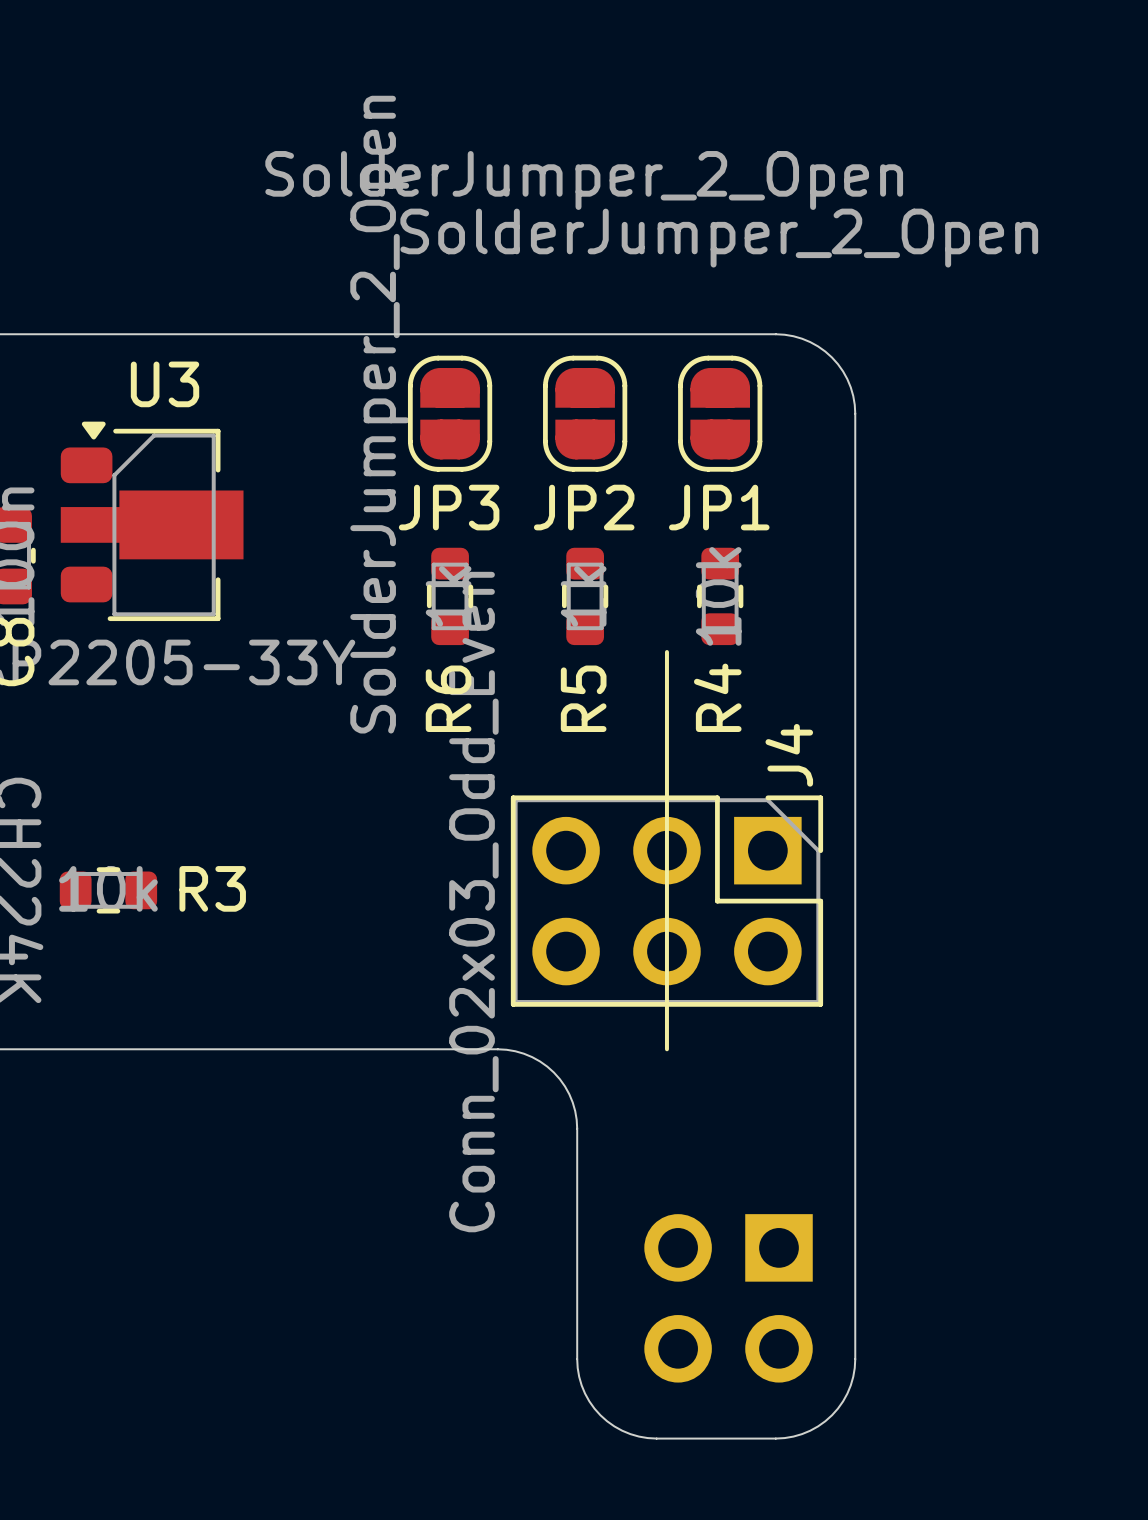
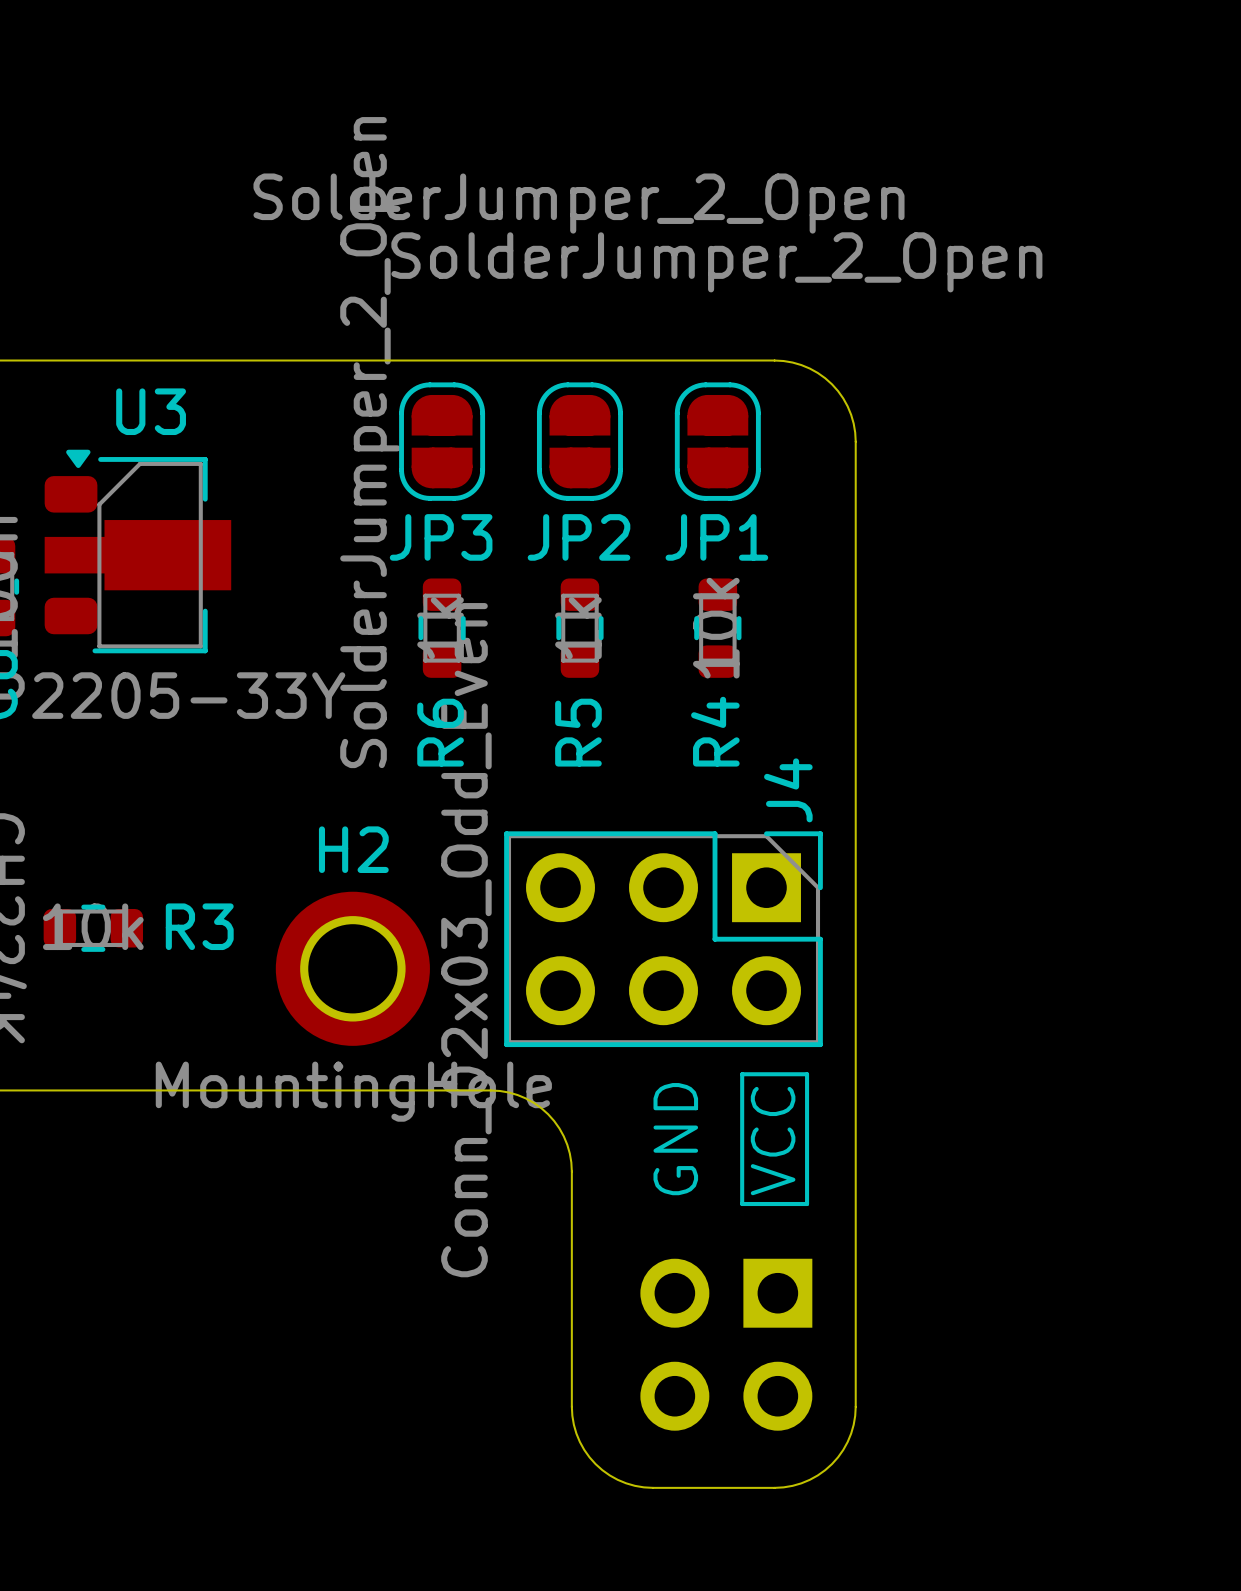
line: (666, 652) (666, 1049) -> none
H2: none -> MountingHole (352, 968)
line: none -> (742, 1074) (807, 1074) (807, 1204) (742, 1204) (742, 1074)
text: none -> GND (675, 1139)
text: none -> VCC (773, 1141)

